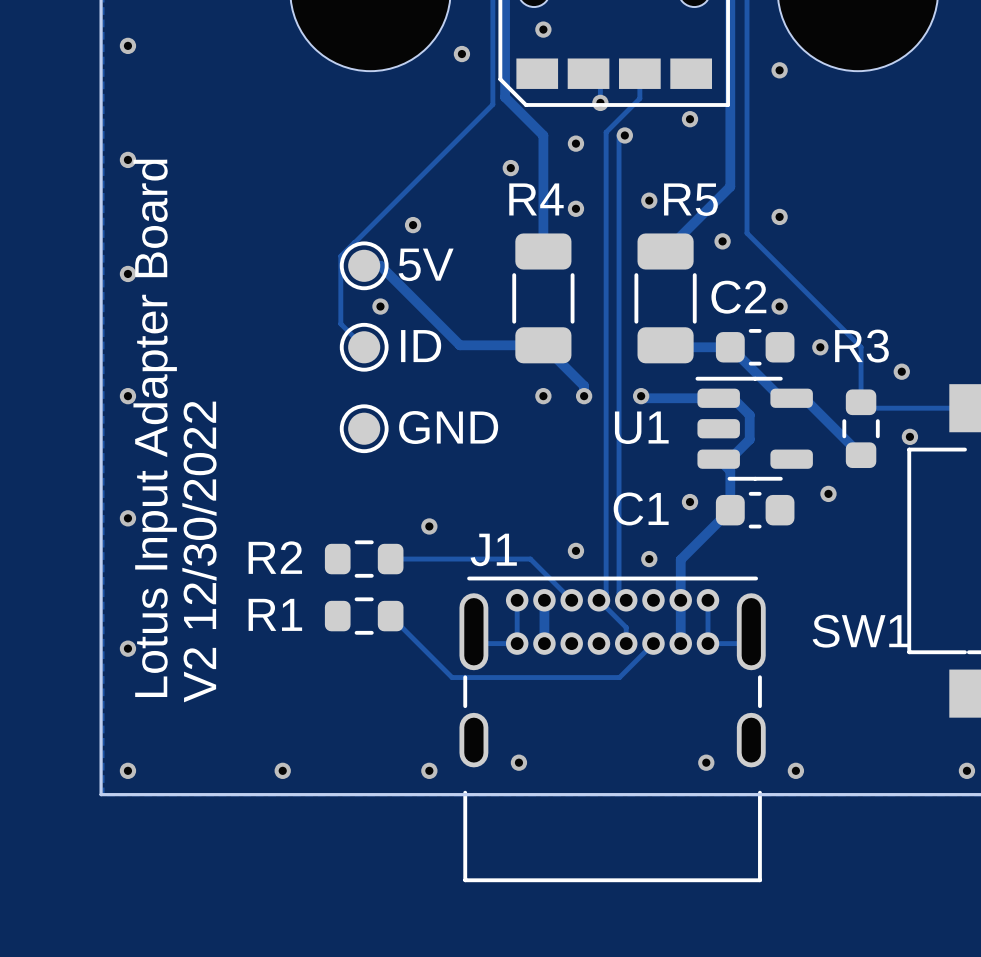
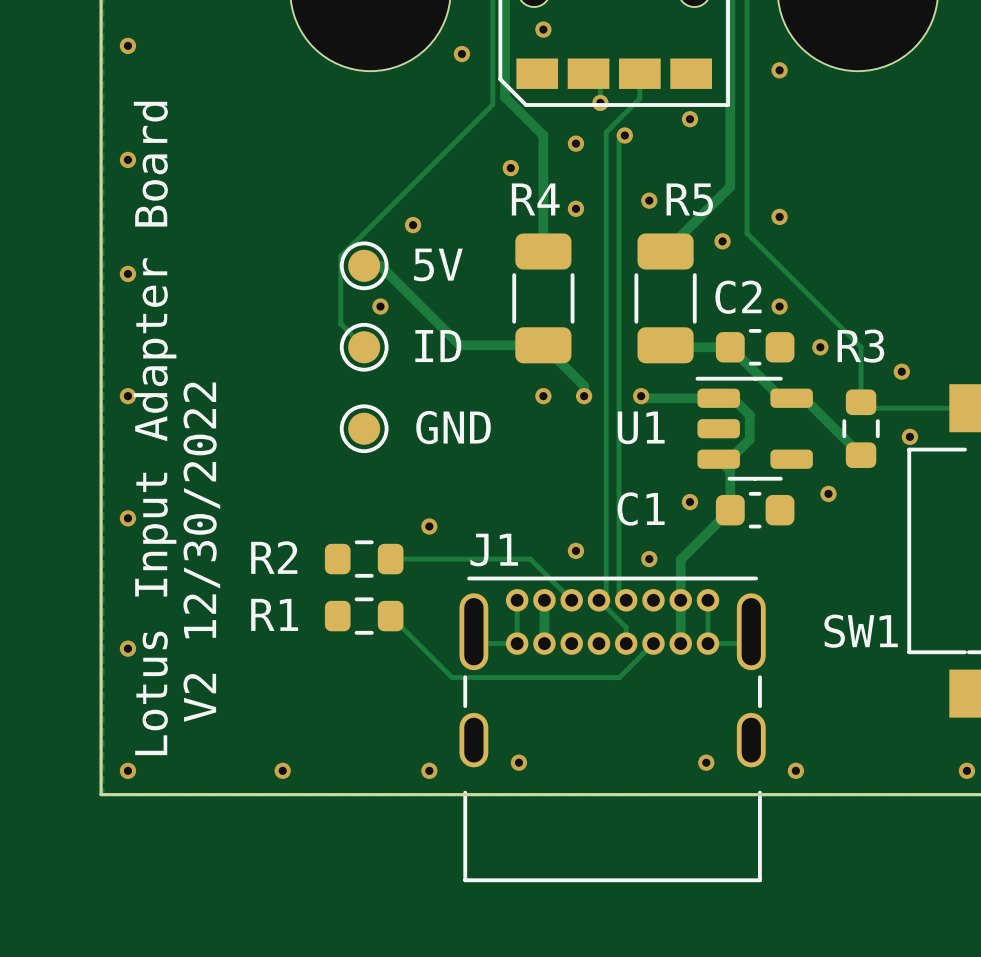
text: 5V (426, 264) -> none
5V name: none -> 5V (438, 264)
text: ID (421, 346) -> none
ID name: none -> ID (438, 346)
text: GND (448, 427) -> none
GND name: none -> GND (453, 427)

